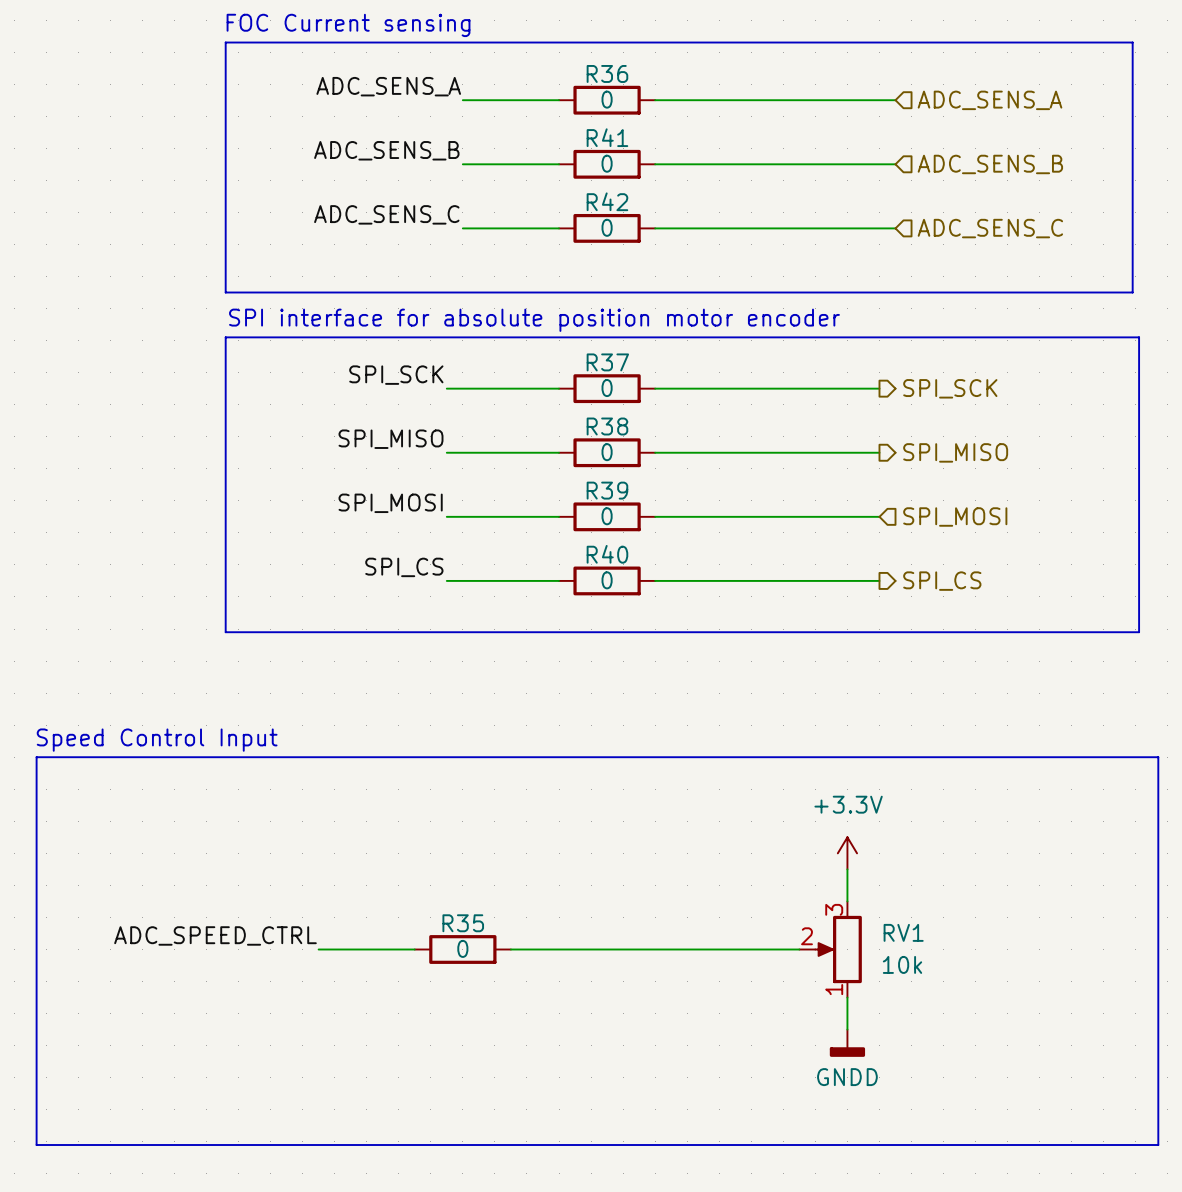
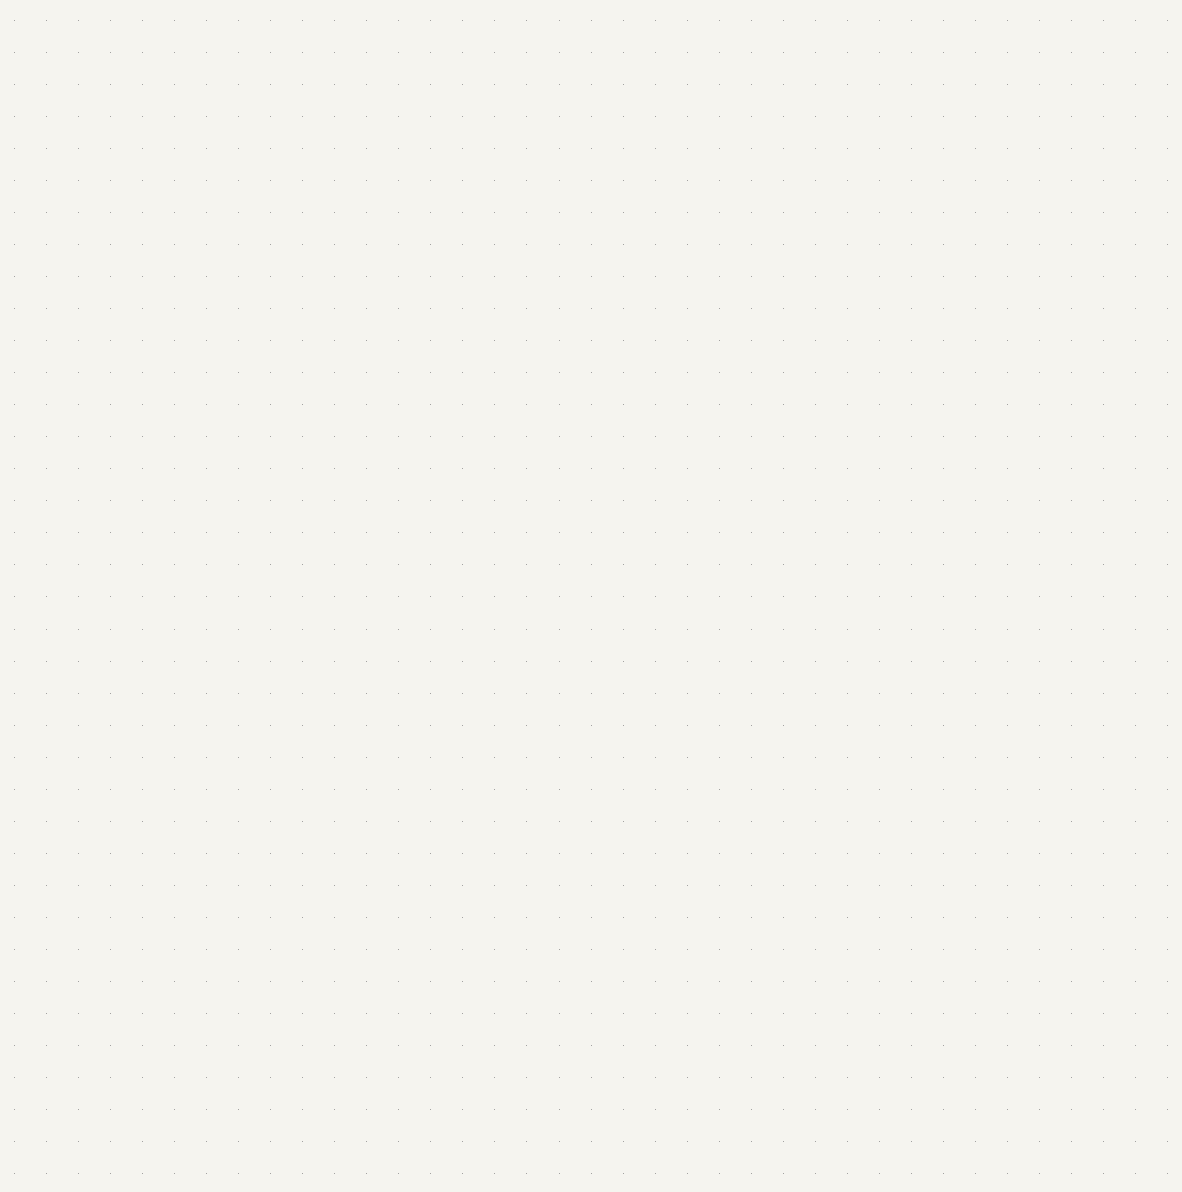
text: FOC Current sensing (348, 25) -> none
line: (225, 42) (1132, 42) (1132, 292) (225, 292) (225, 42) -> none
label: ADC_SENS_A (388, 86) -> none
wire: (462, 100) (559, 100) -> none
R36: 0 (607, 100) -> none
wire: (655, 100) (895, 100) -> none
hierarchical label: ADC_SENS_A (990, 100) -> none
label: ADC_SENS_B (386, 150) -> none
wire: (462, 164) (559, 164) -> none
R41: 0 (607, 164) -> none
wire: (655, 164) (895, 164) -> none
hierarchical label: ADC_SENS_B (990, 164) -> none
label: ADC_SENS_C (386, 214) -> none
wire: (462, 228) (559, 228) -> none
R42: 0 (607, 228) -> none
wire: (655, 228) (895, 228) -> none
hierarchical label: ADC_SENS_C (990, 228) -> none
text: SPI interface for absolute position motor encoder (534, 320) -> none
line: (225, 337) (225, 632) (1139, 632) (1139, 337) (225, 337) -> none
label: SPI_SCK (396, 375) -> none
wire: (446, 388) (559, 388) -> none
R37: 0 (607, 388) -> none
wire: (655, 388) (879, 388) -> none
hierarchical label: SPI_SCK (950, 388) -> none
label: SPI_MISO (391, 439) -> none
wire: (446, 452) (559, 452) -> none
R38: 0 (607, 452) -> none
wire: (655, 452) (879, 452) -> none
hierarchical label: SPI_MISO (955, 452) -> none
label: SPI_MOSI (390, 503) -> none
wire: (446, 516) (559, 516) -> none
R39: 0 (607, 516) -> none
wire: (655, 516) (879, 516) -> none
hierarchical label: SPI_MOSI (955, 517) -> none
label: SPI_CS (404, 567) -> none
wire: (446, 580) (559, 580) -> none
R40: 0 (607, 580) -> none
wire: (655, 580) (879, 580) -> none
hierarchical label: SPI_CS (942, 581) -> none
text: Speed Control Input (157, 740) -> none
line: (36, 757) (1158, 757) (1158, 1145) (36, 1145) (36, 757) -> none
power symbol: +3.3V (847, 853) -> none
wire: (847, 869) (847, 901) -> none
label: ADC_SPEED_CTRL (215, 935) -> none
wire: (318, 949) (414, 949) -> none
R35: 0 (462, 949) -> none
wire: (510, 949) (799, 949) -> none
RV1: 10k (830, 949) -> none
wire: (847, 997) (847, 1029) -> none
power symbol: GNDD (847, 1043) -> none

